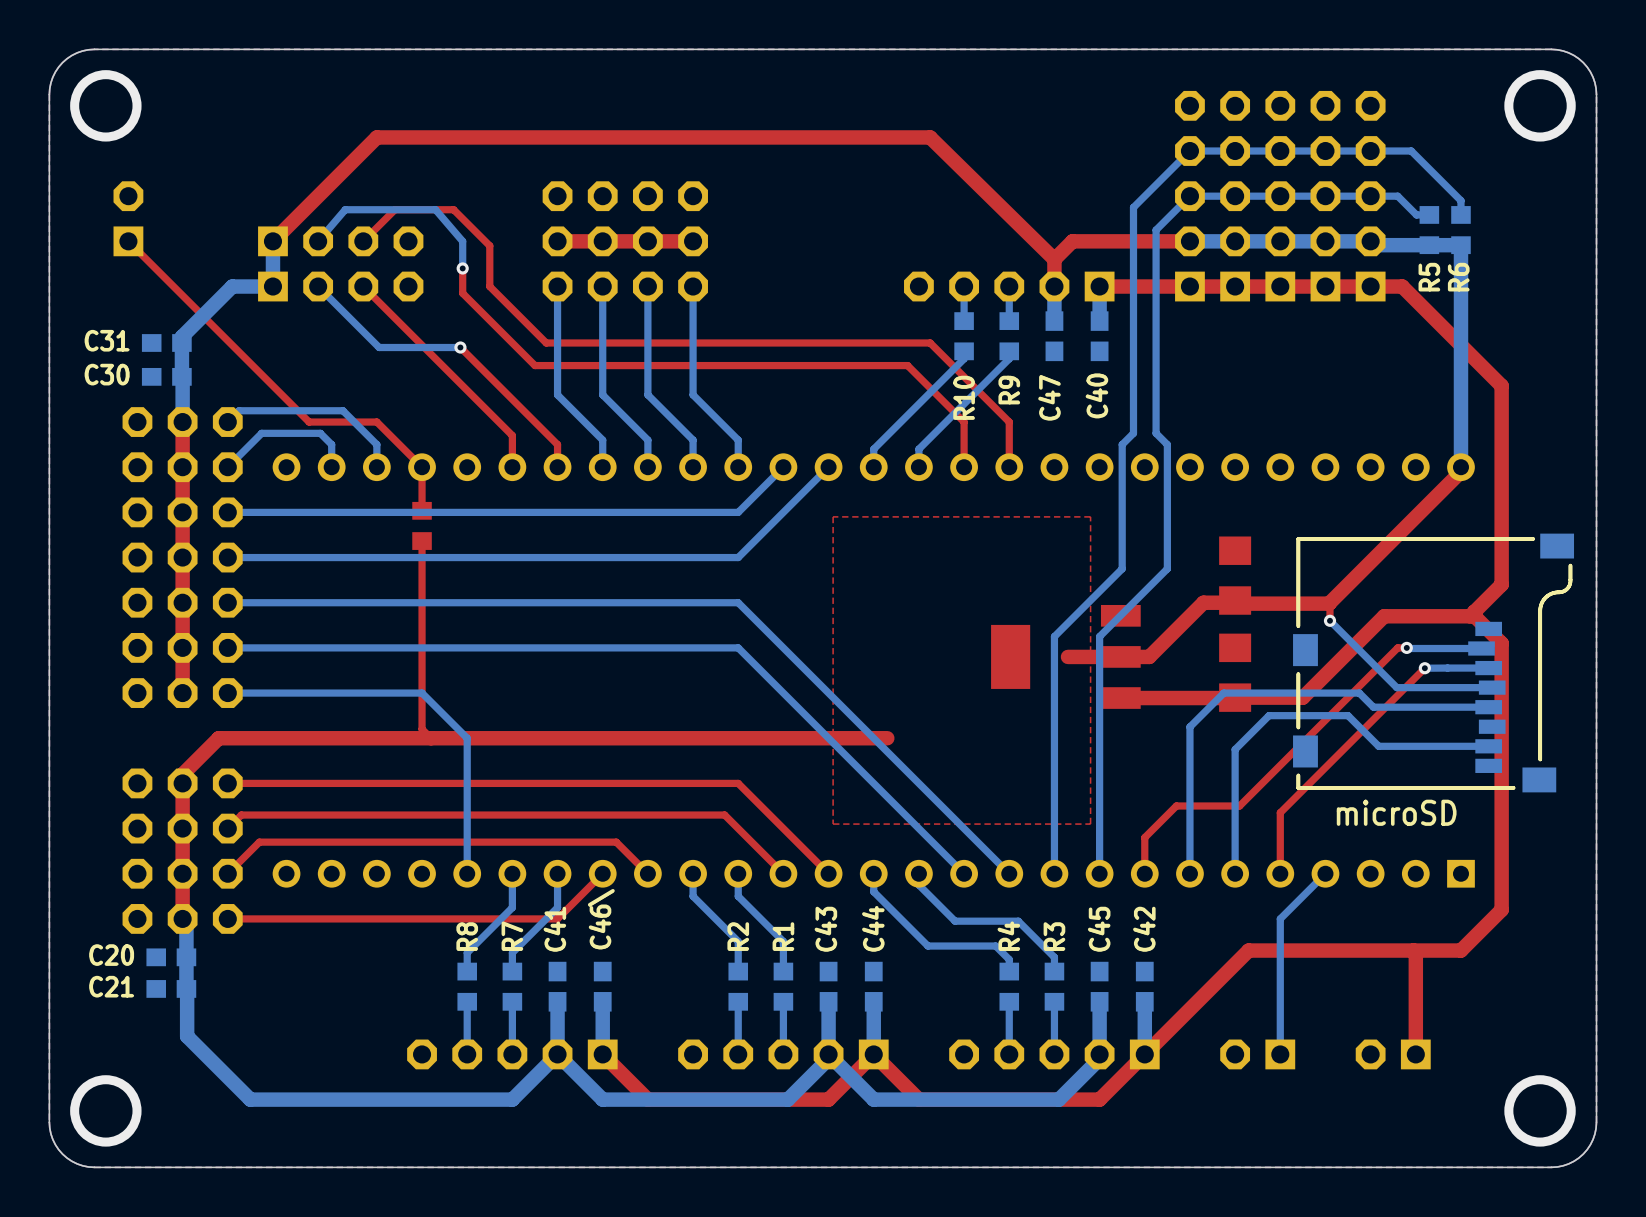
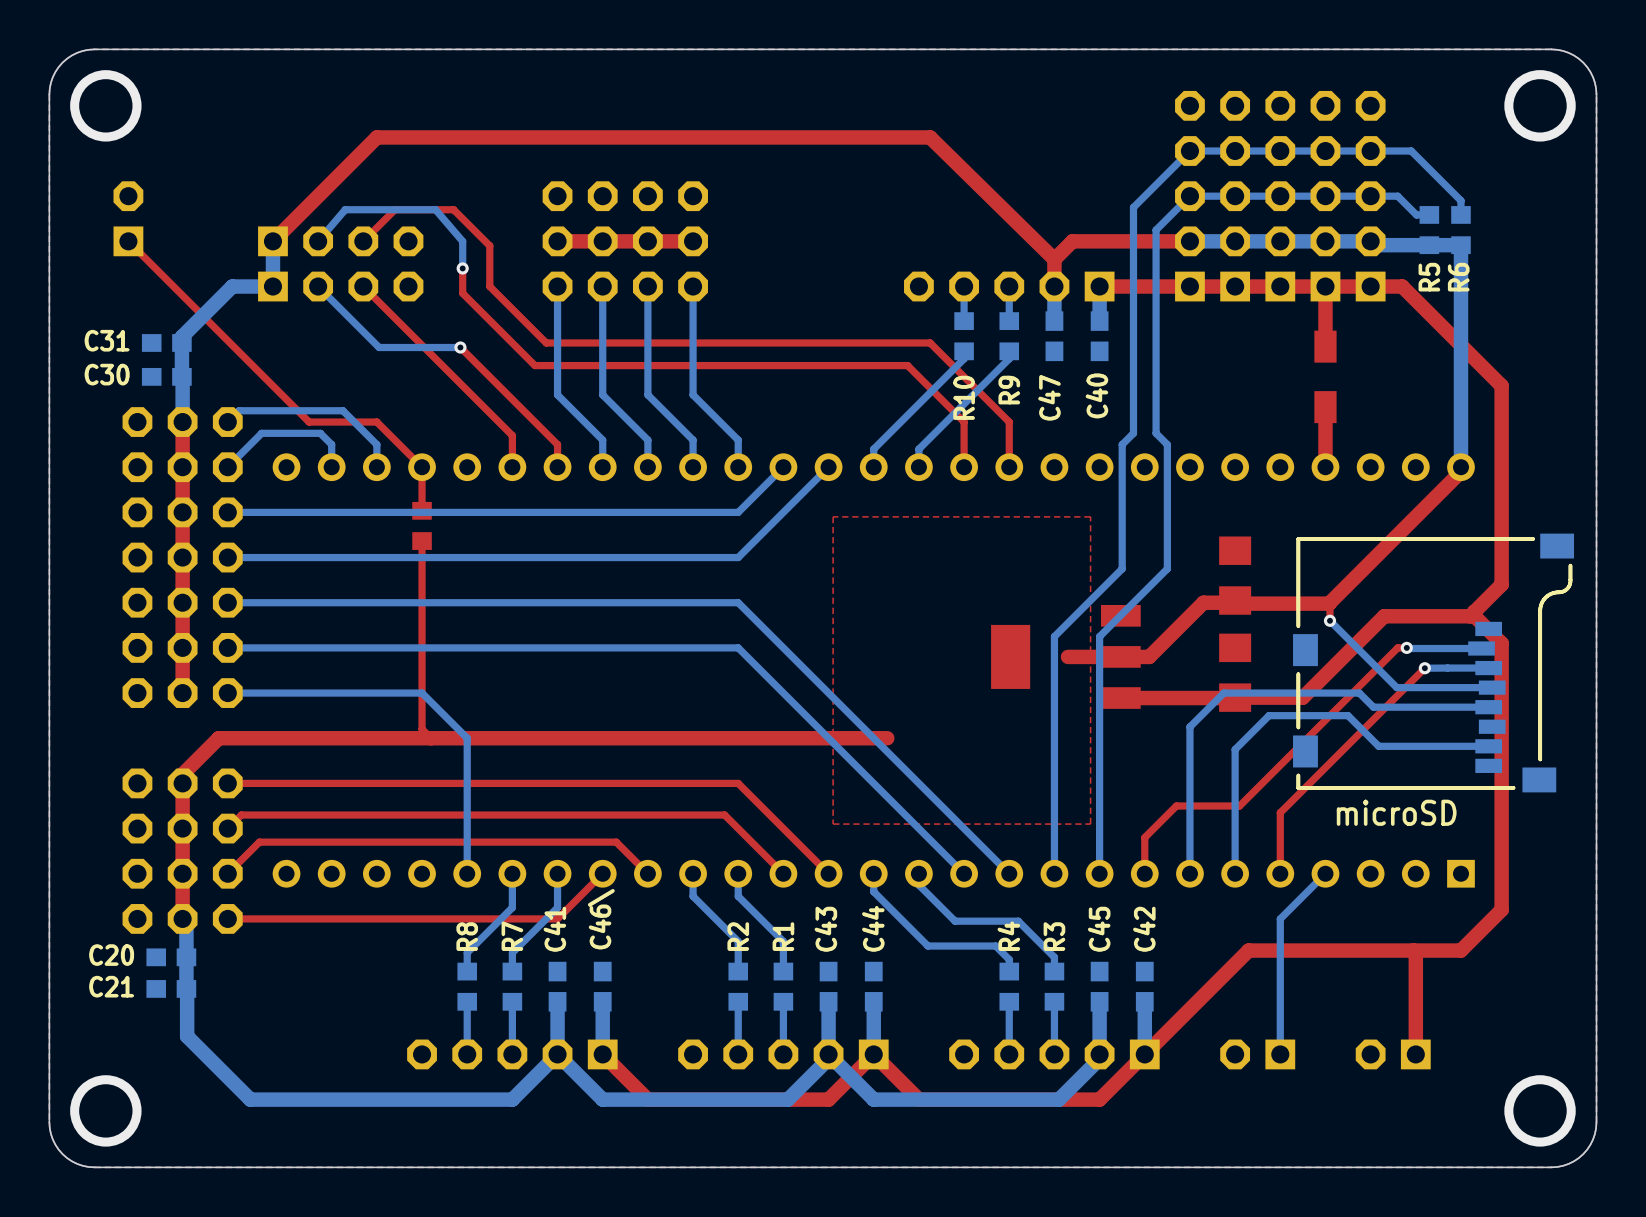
top track: none -> (1325, 286) (1325, 346)
part: none -> (1325, 376)
top track: none -> (1325, 407) (1325, 467)

